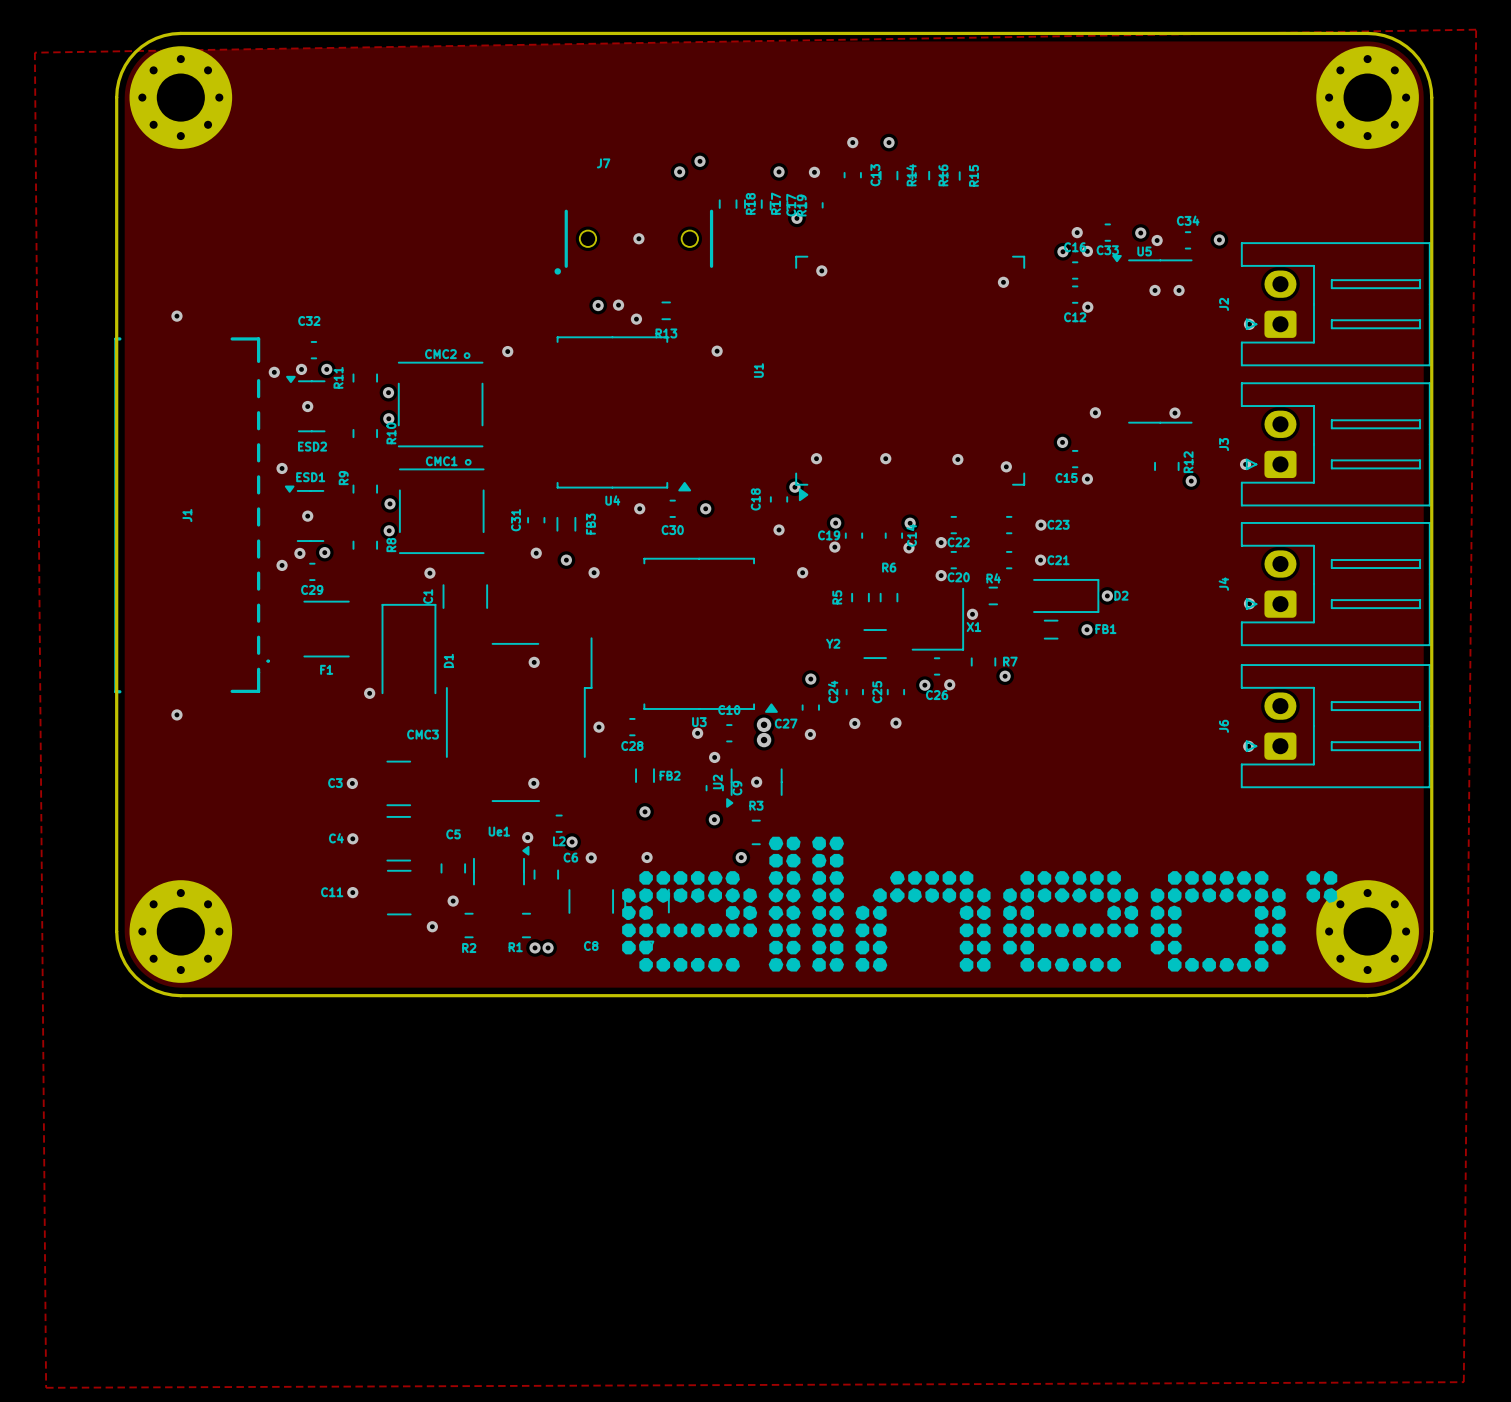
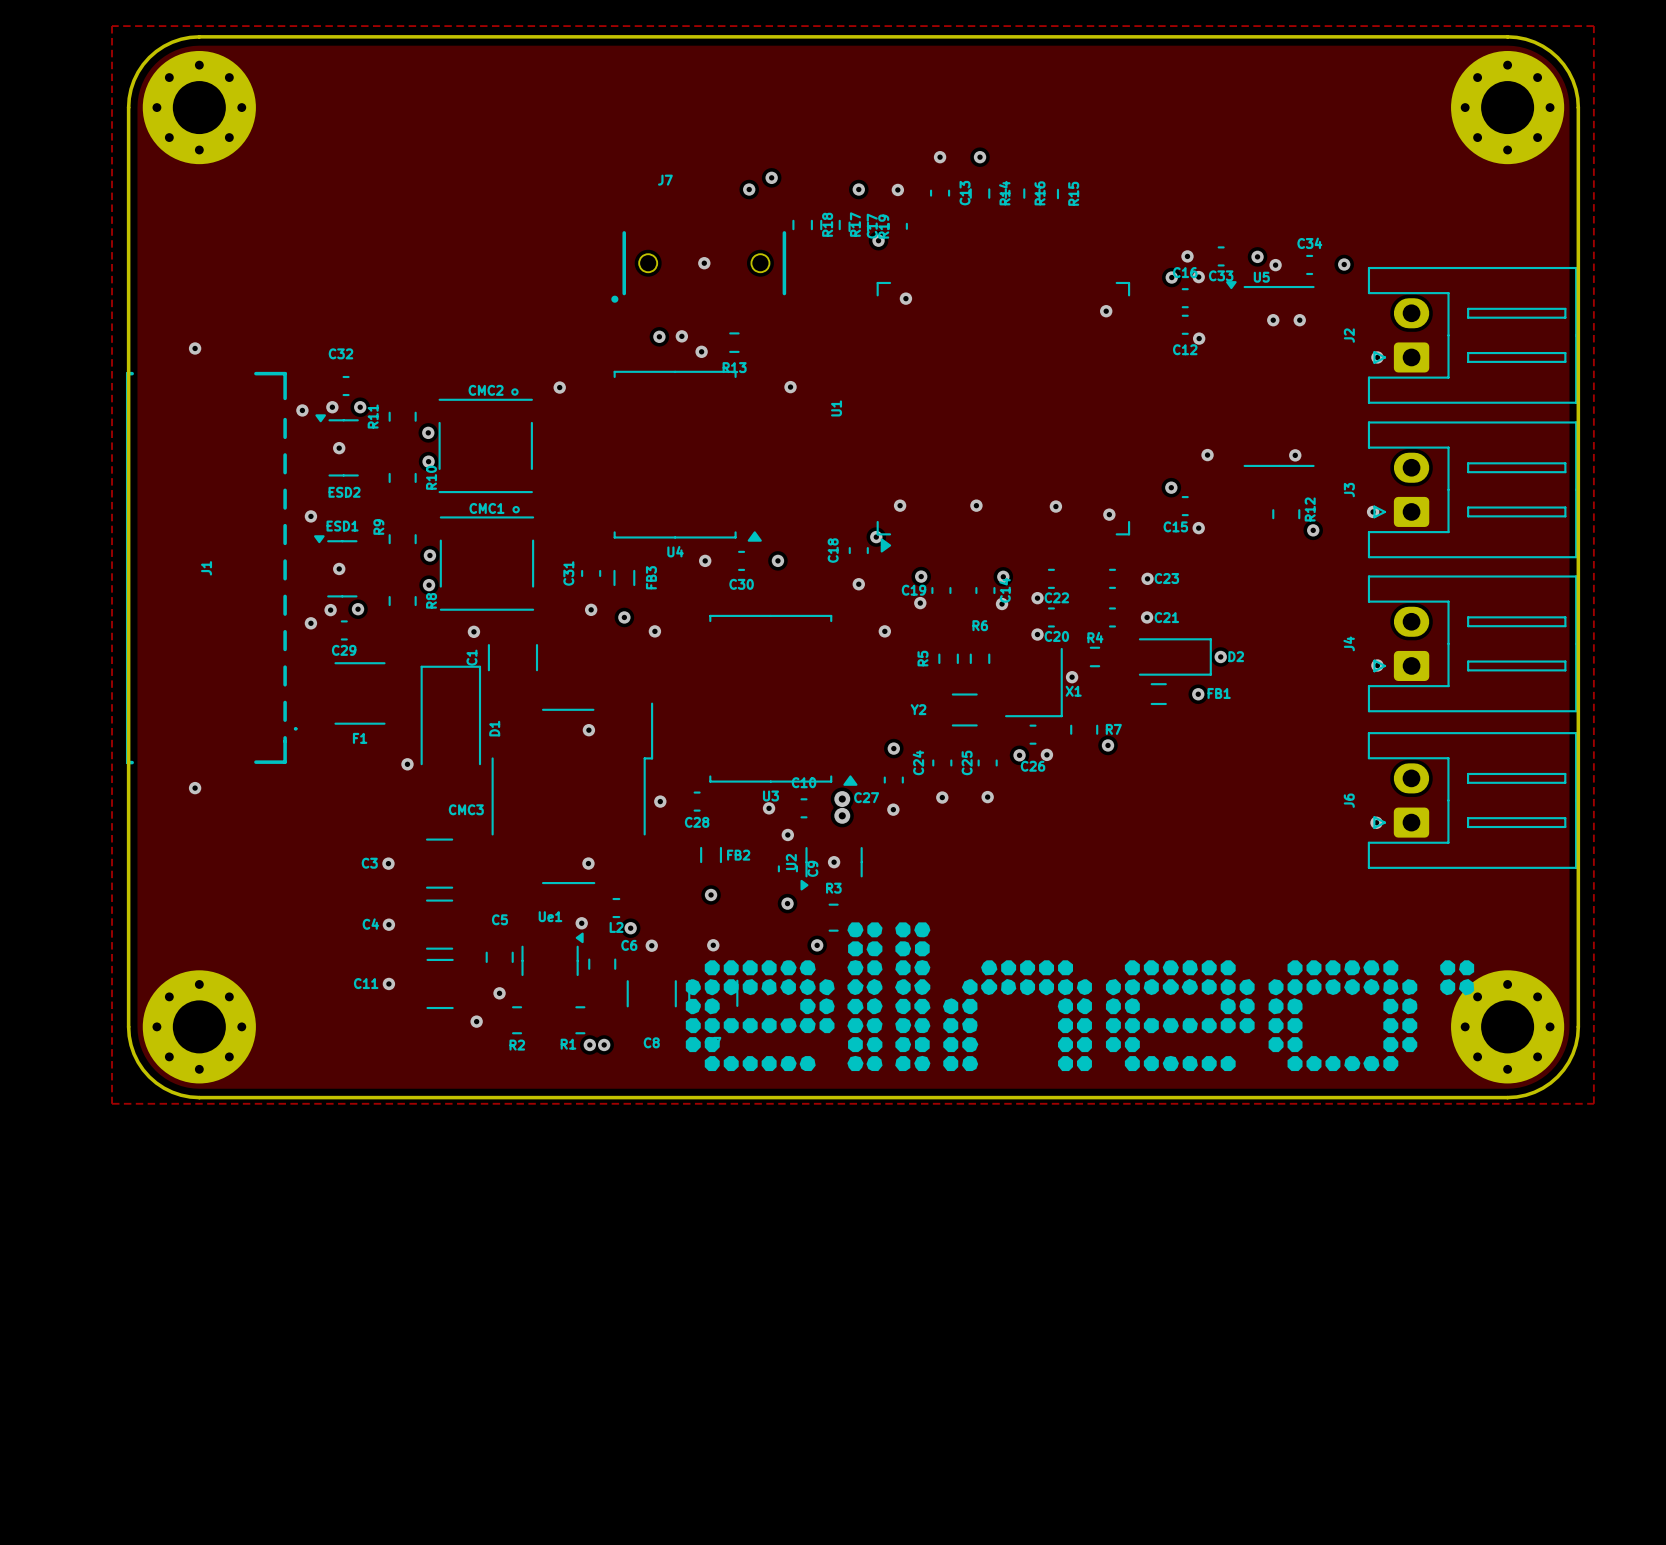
zone outline: (1476, 29) (1463, 1382) (46, 1387) (34, 52) (1476, 29) -> (112, 26) (112, 1103) (1593, 1103) (1593, 26) (112, 26)

